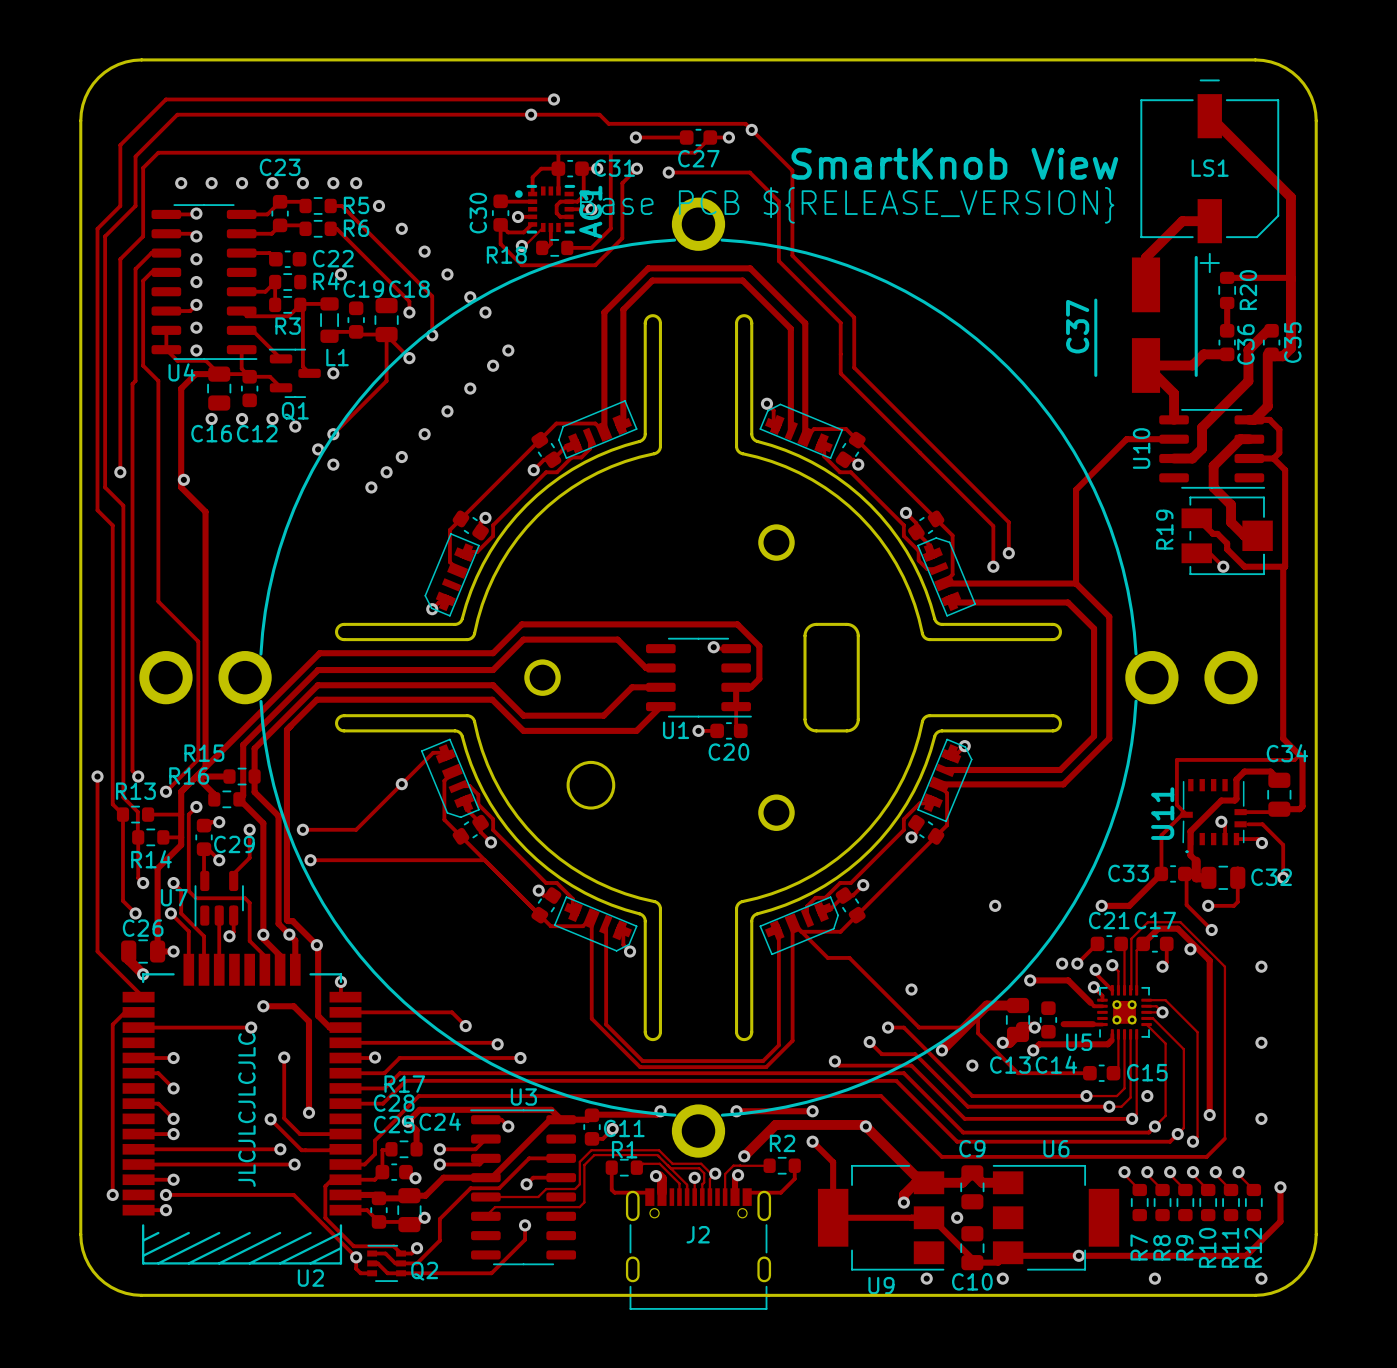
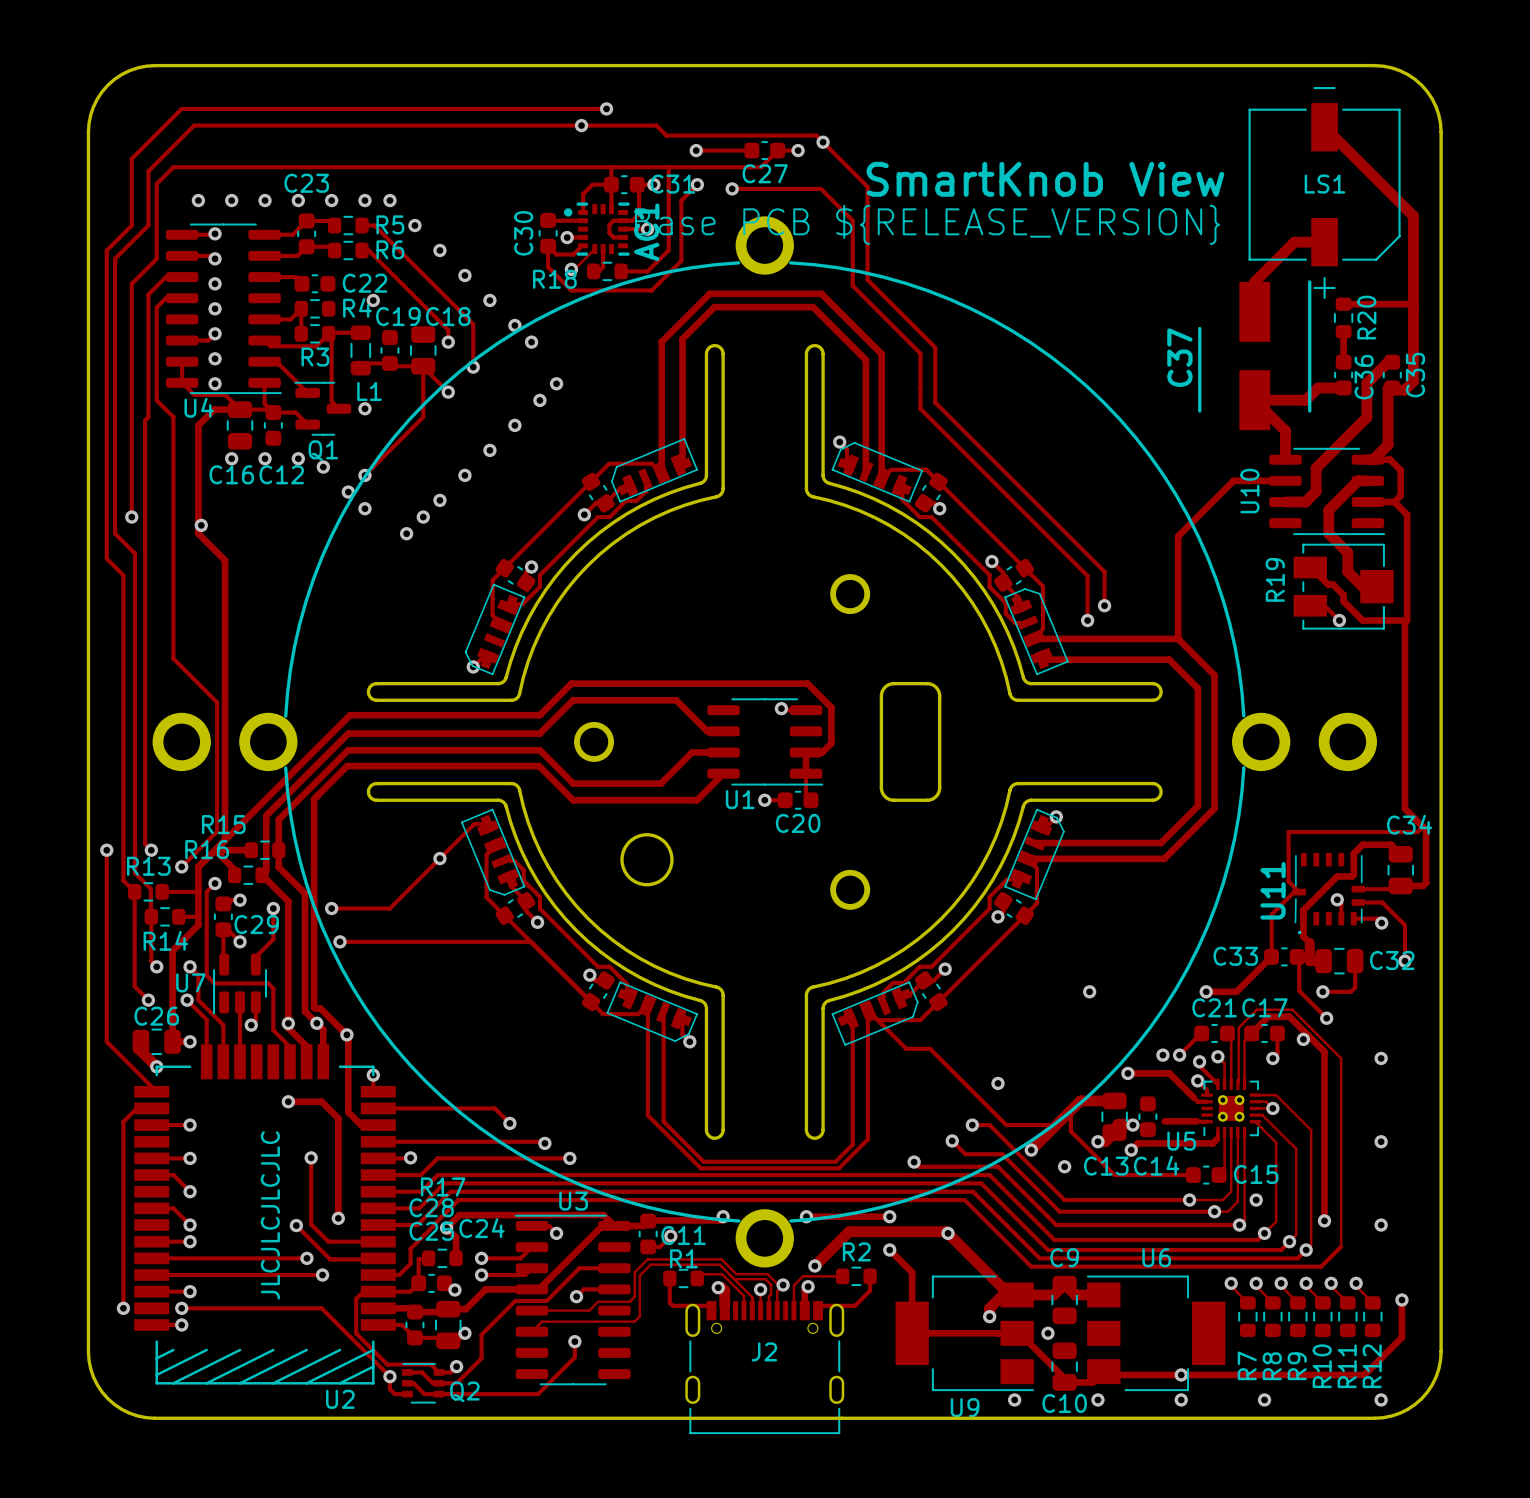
track: (173, 1027) (251, 1027) -> none
via position: (251, 1027) -> (190, 1125)
track: none -> (373, 1225) (417, 1225) (450, 1191) (973, 1191) (1039, 1258) (1297, 1258) (1306, 1250)
via: none -> (1181, 1399)

